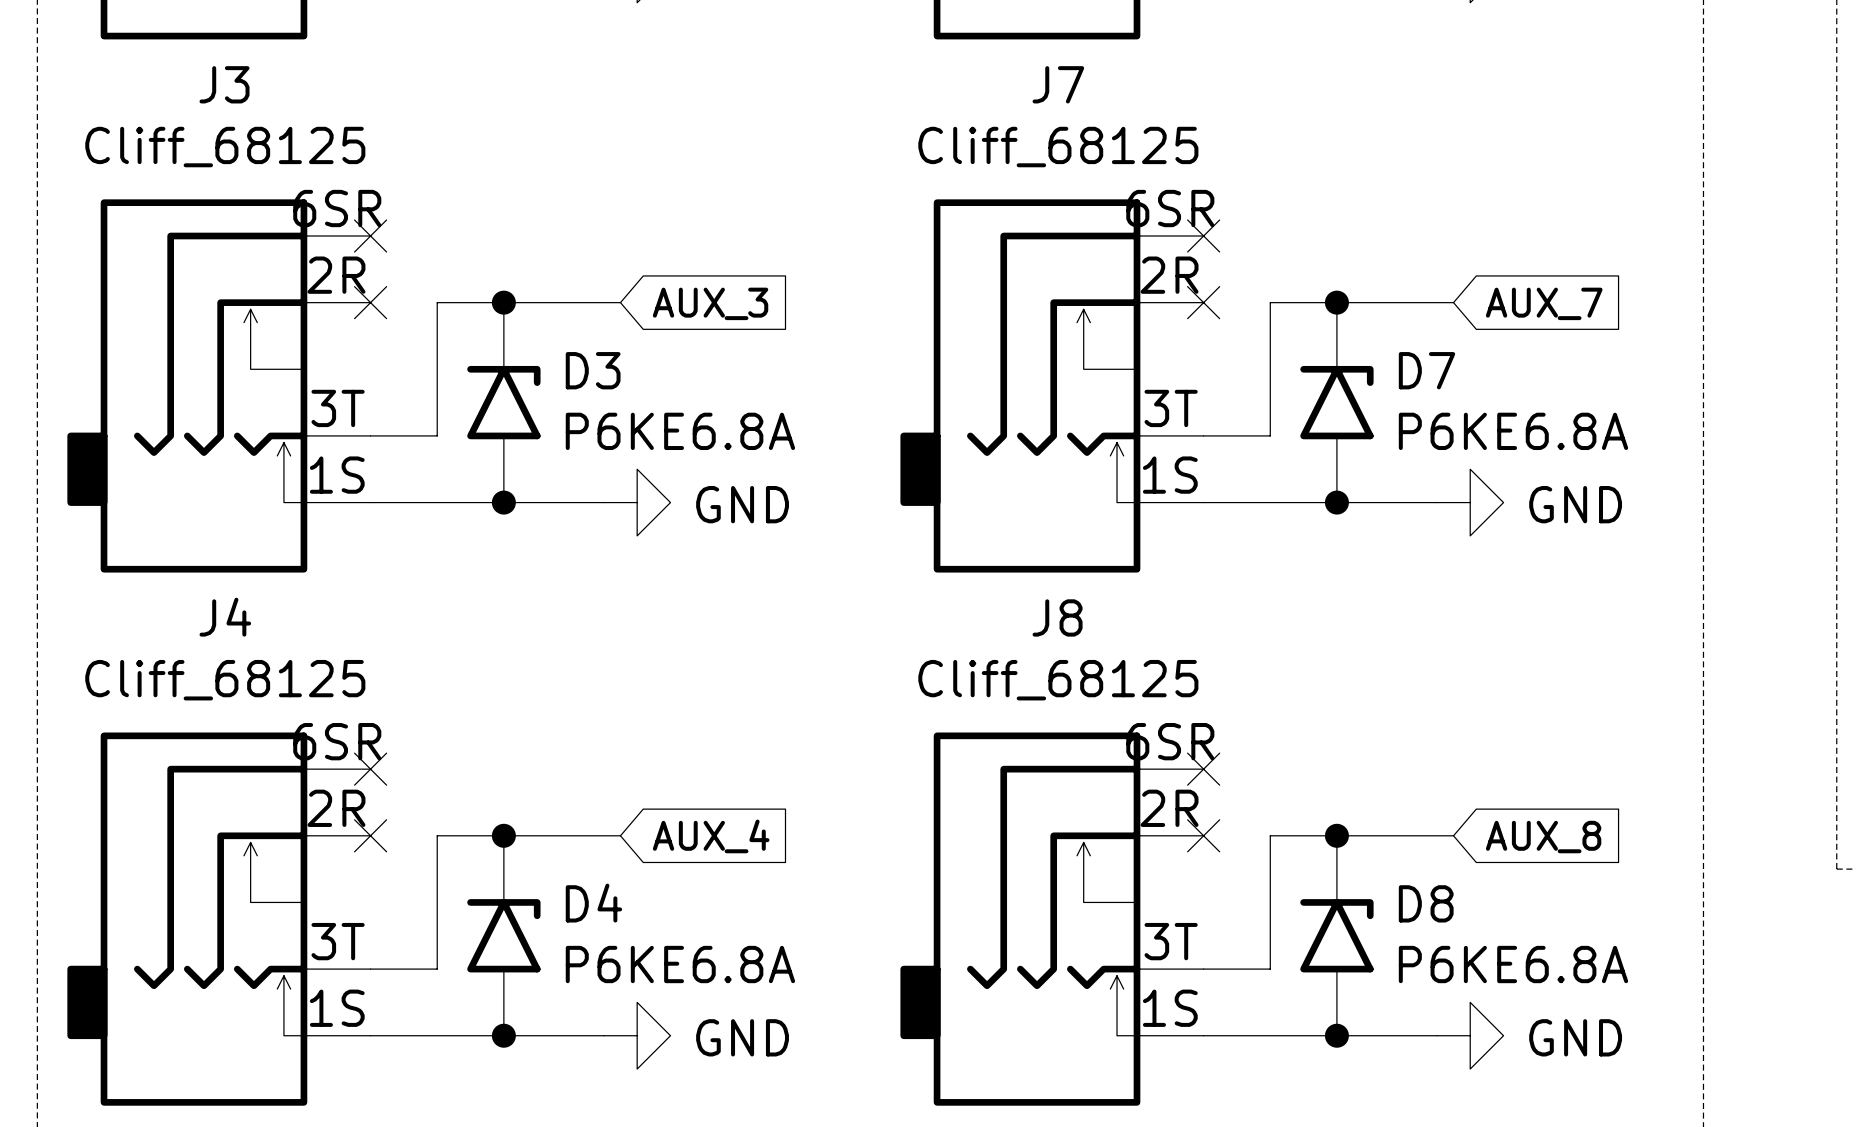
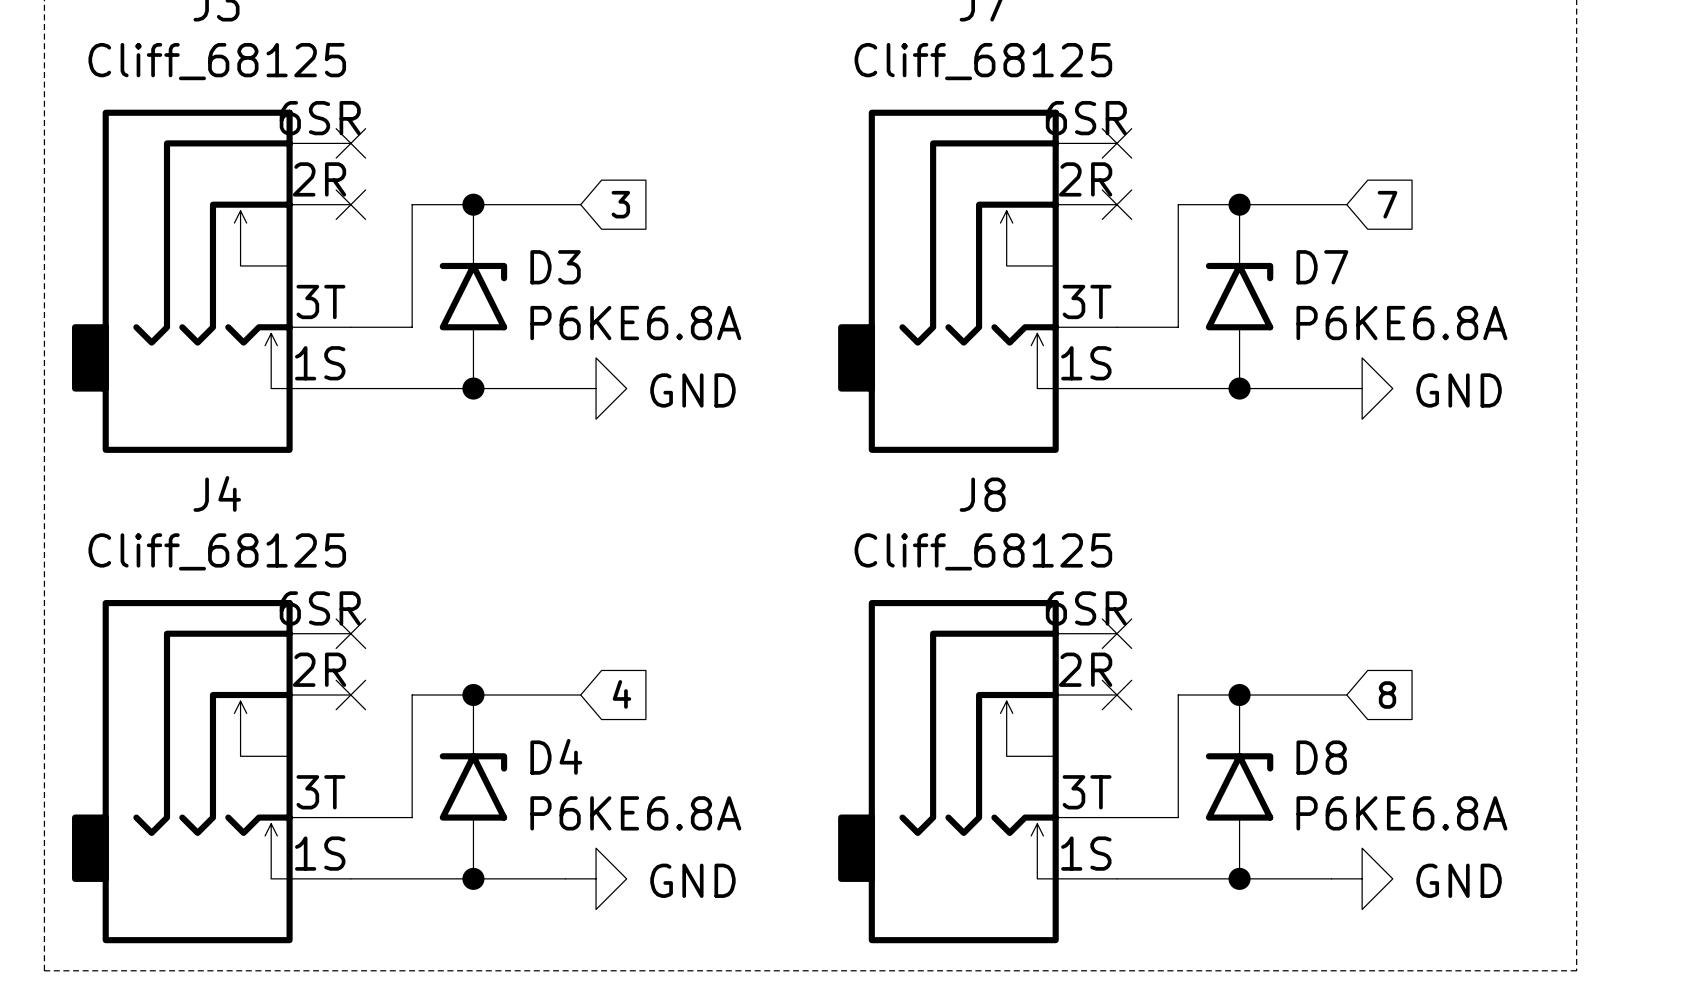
global label: AUX_3 (710, 303) -> 3 (620, 204)
global label: AUX_7 (1544, 303) -> 7 (1387, 204)
global label: AUX_4 (711, 836) -> 4 (621, 694)
global label: AUX_8 (1543, 837) -> 8 (1387, 695)

